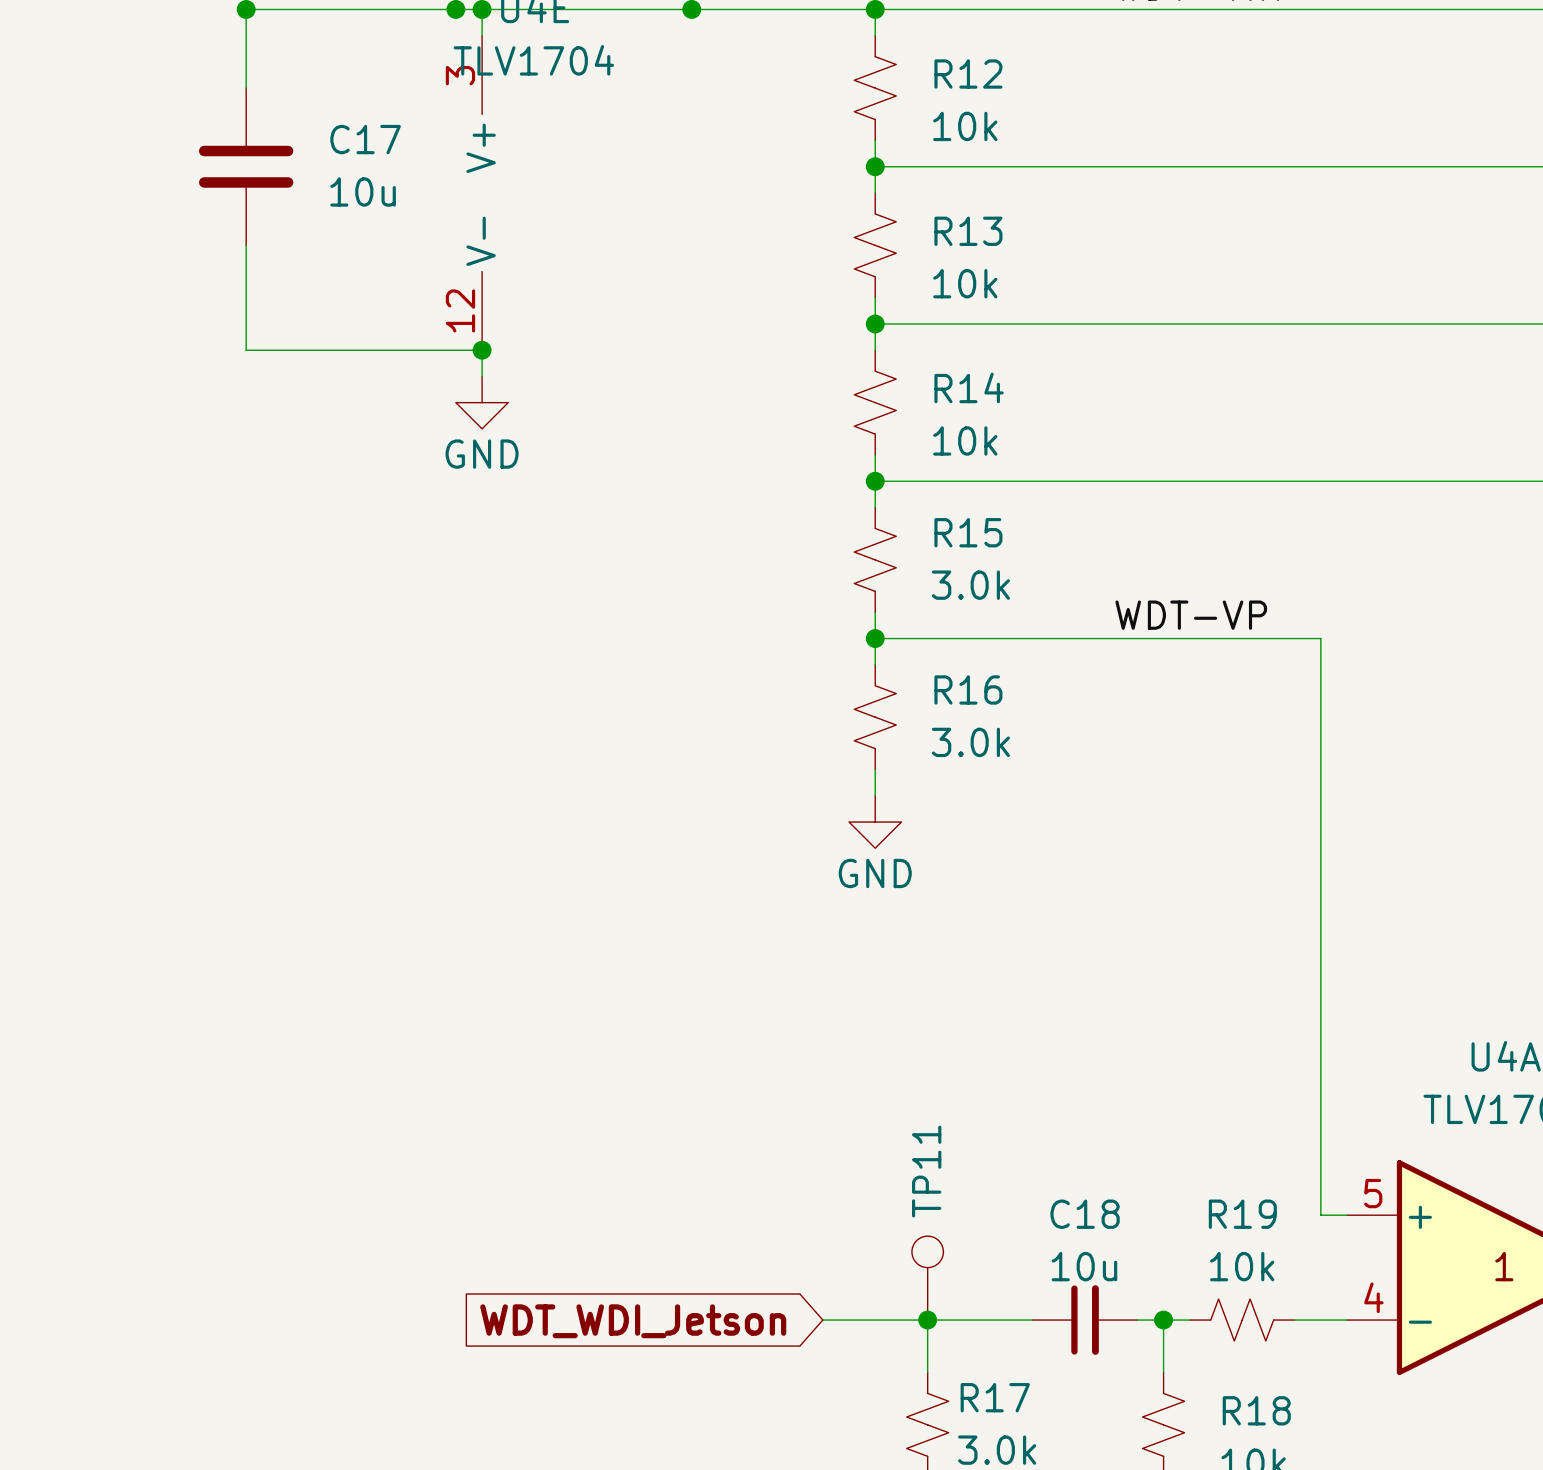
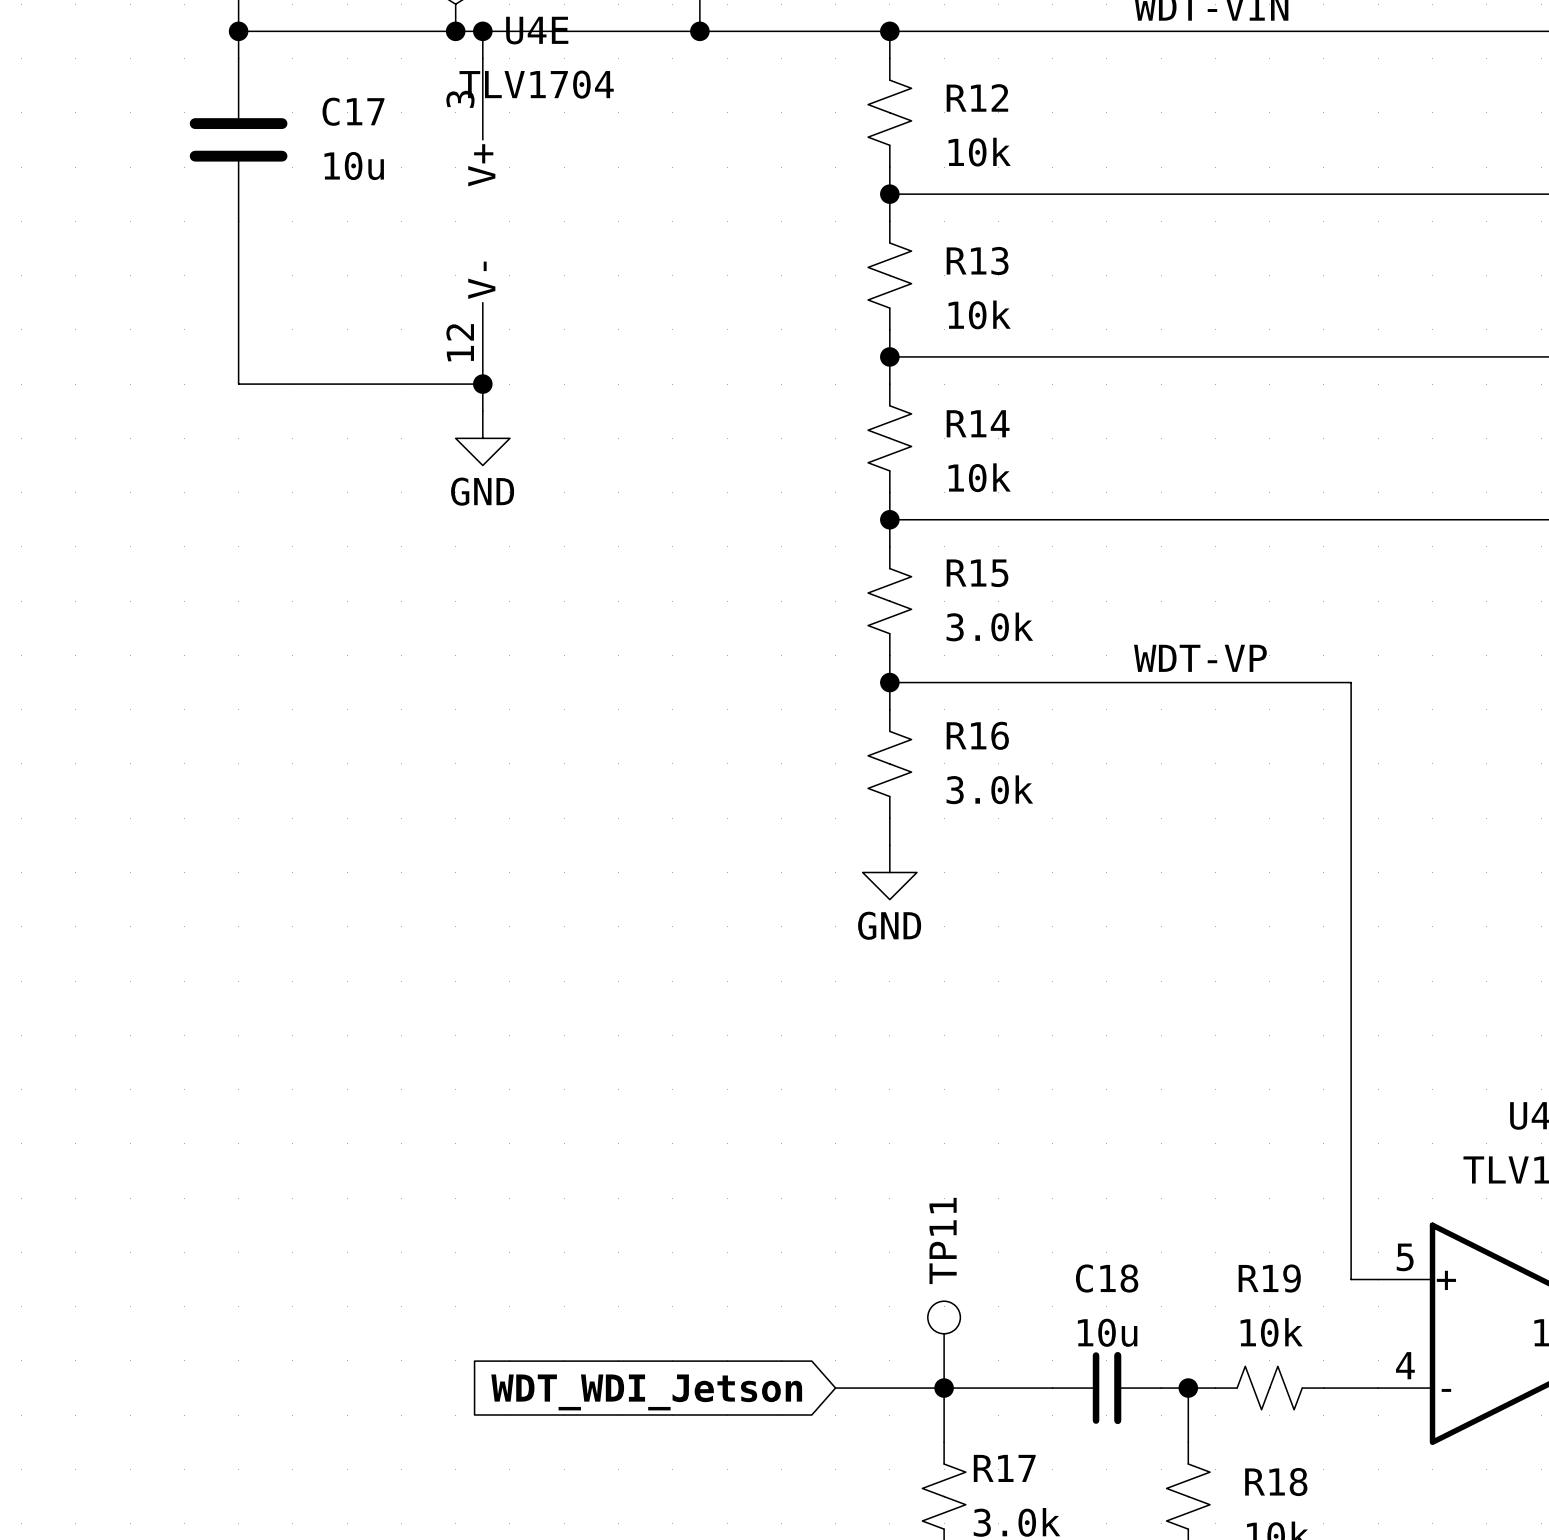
C17 position: (246, 166) -> (238, 139)

